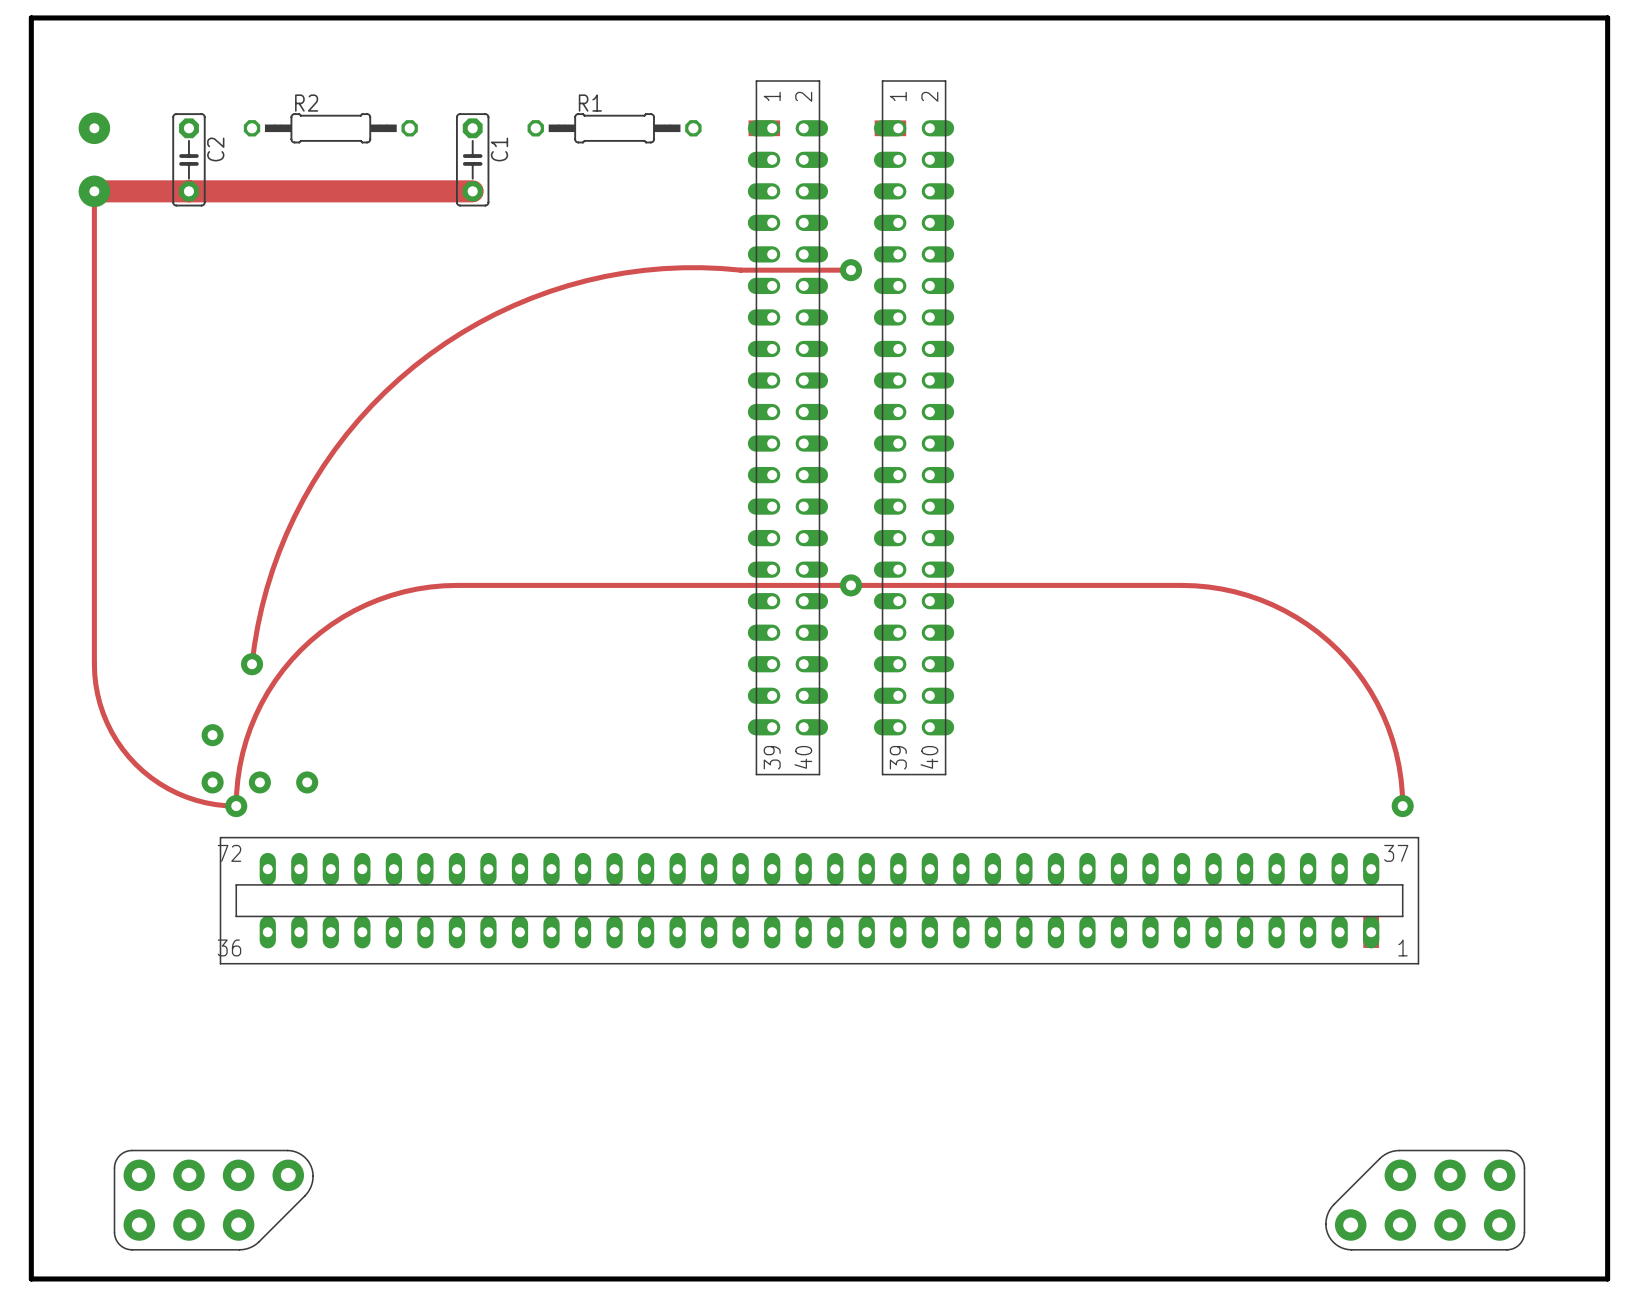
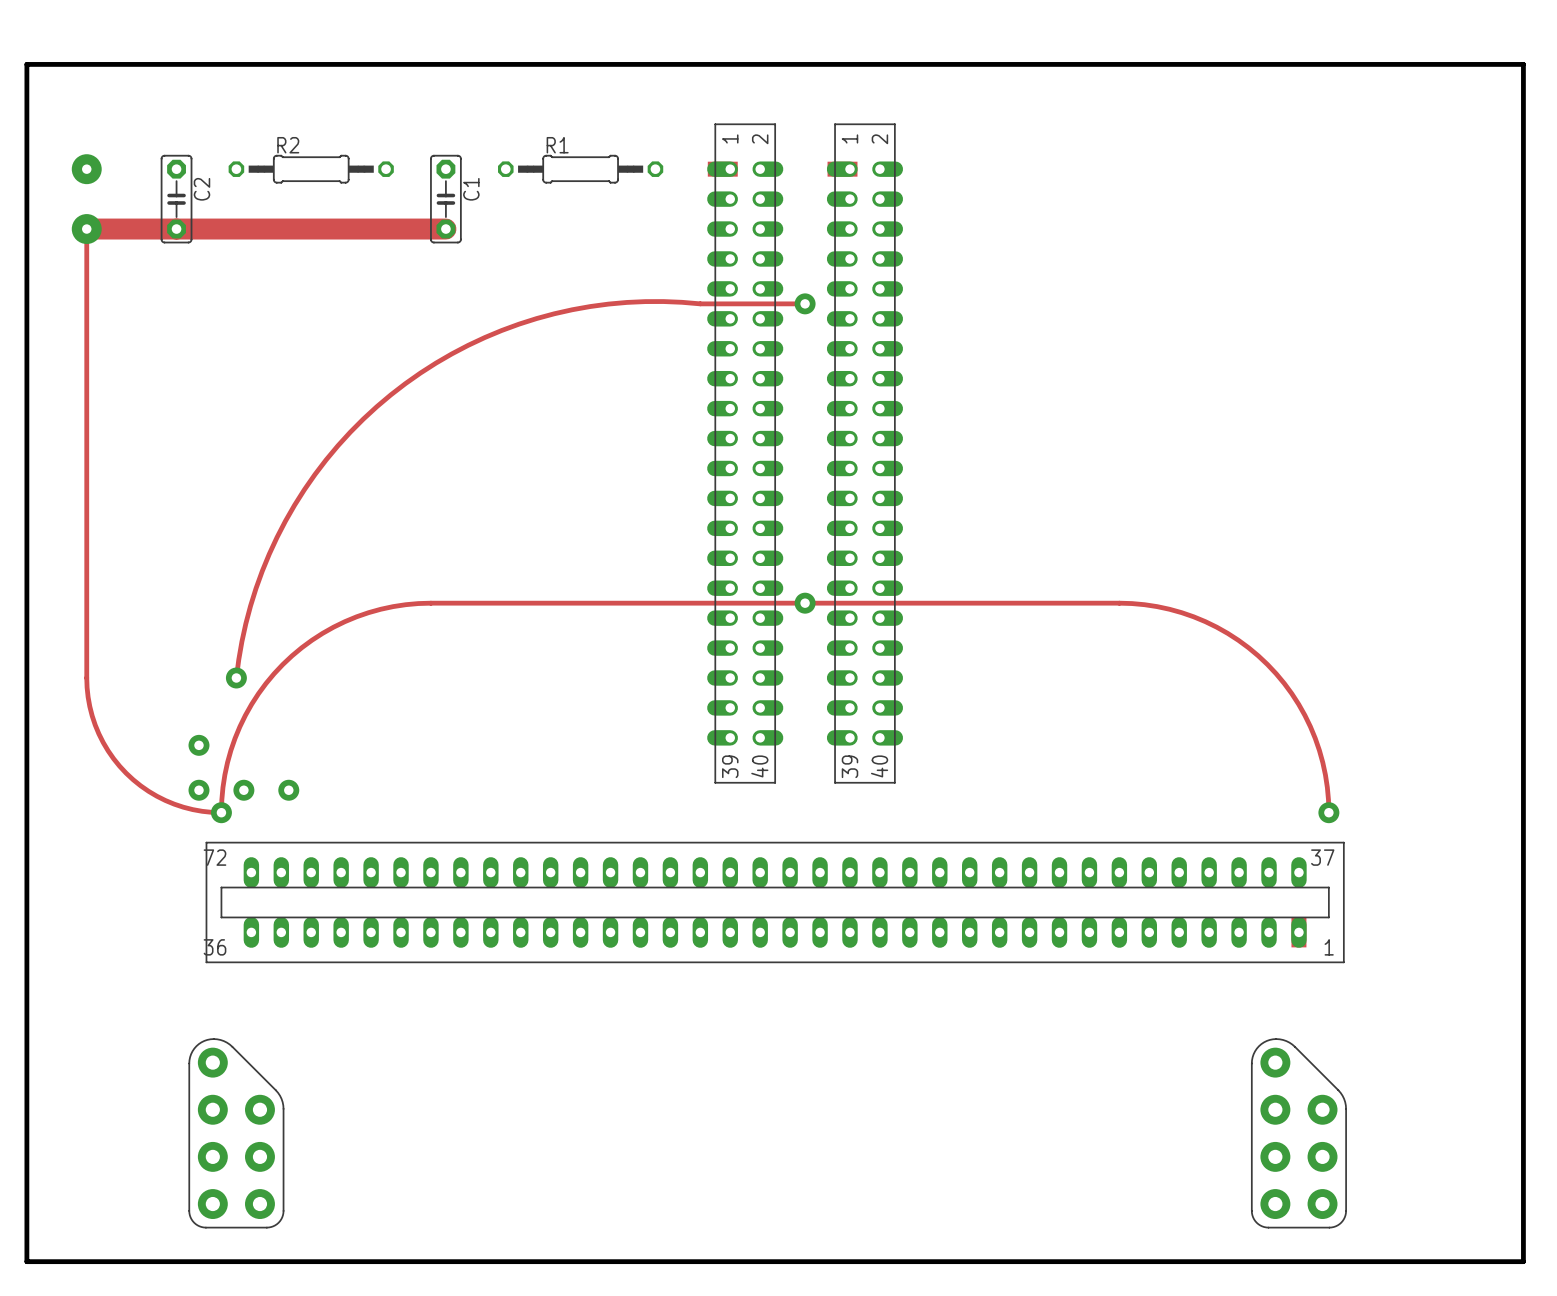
part rotation: 0° (213, 1200) -> 90° counterclockwise (236, 1133)
part rotation: 0° (1425, 1200) -> 90° clockwise (1298, 1133)

